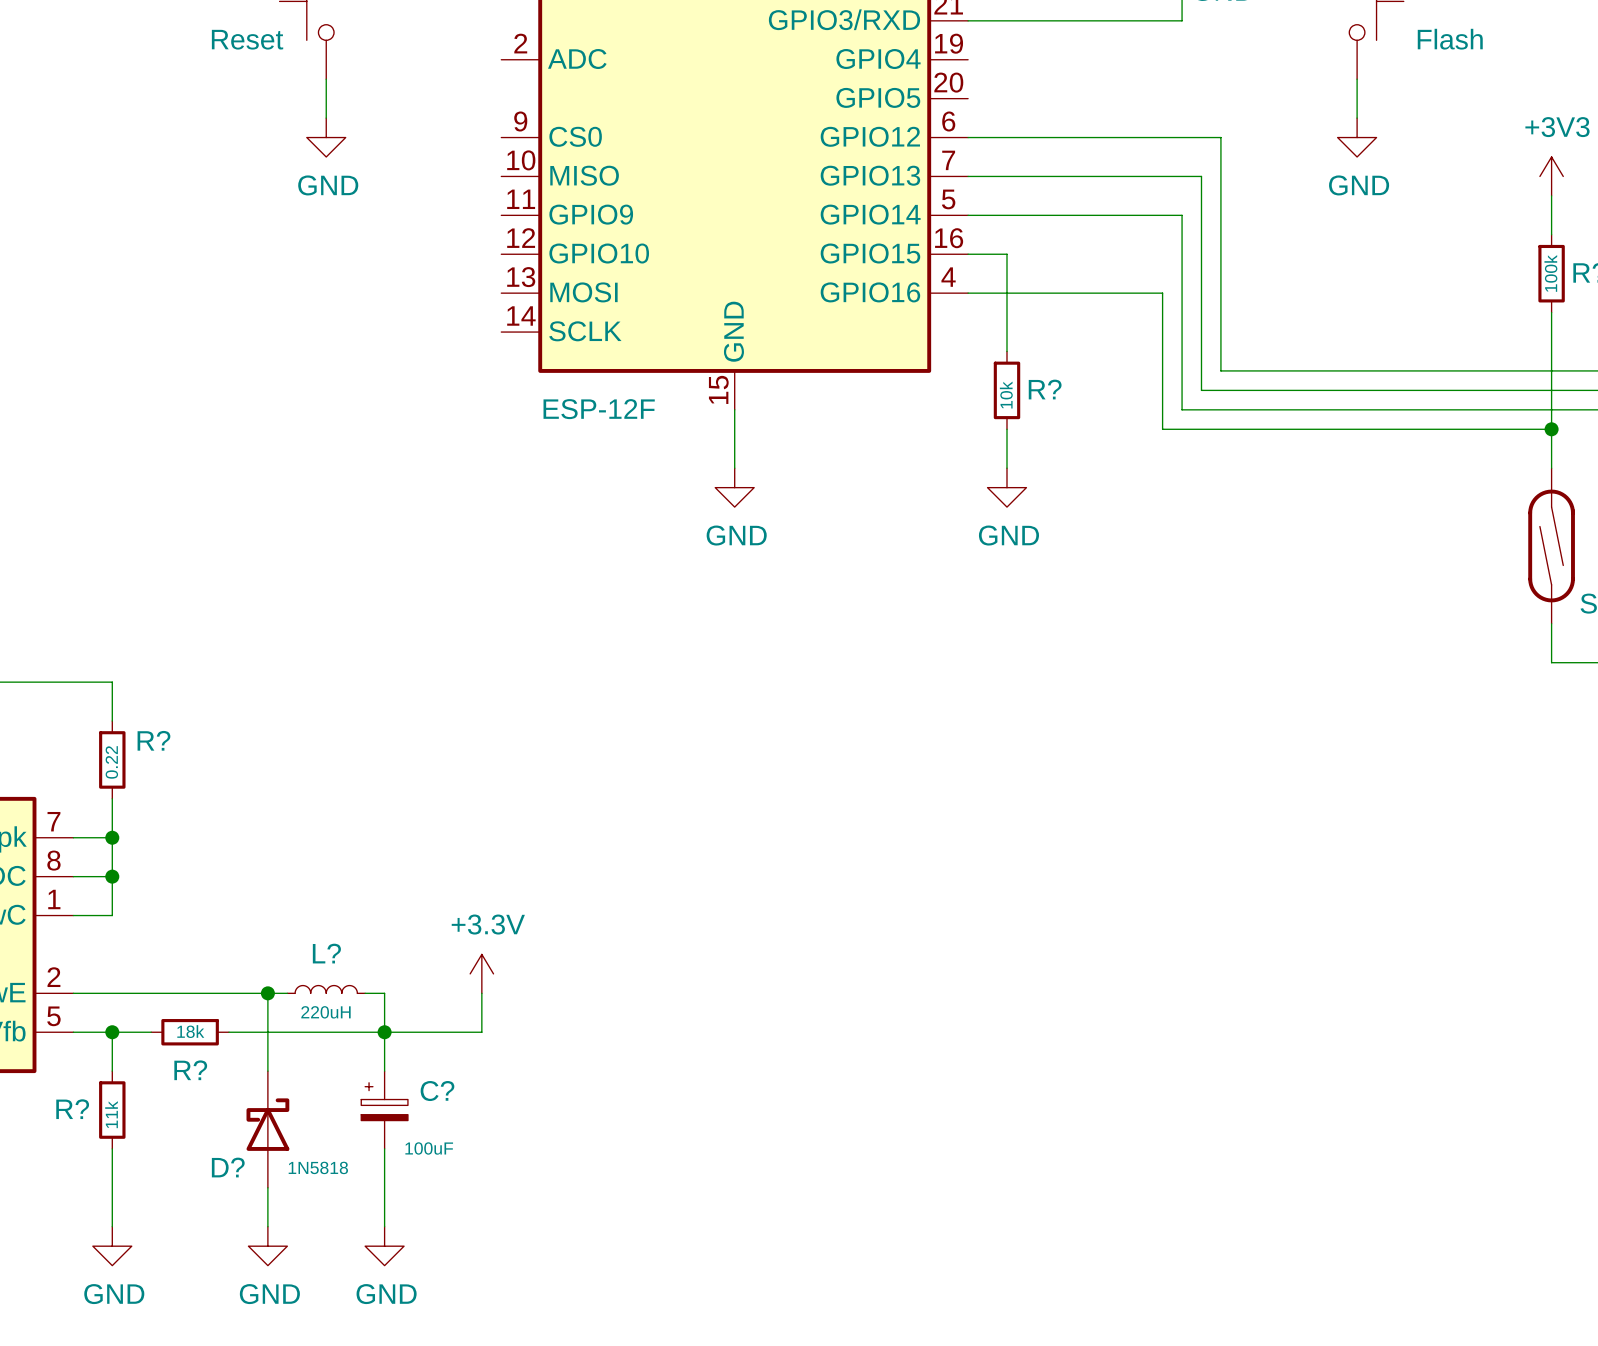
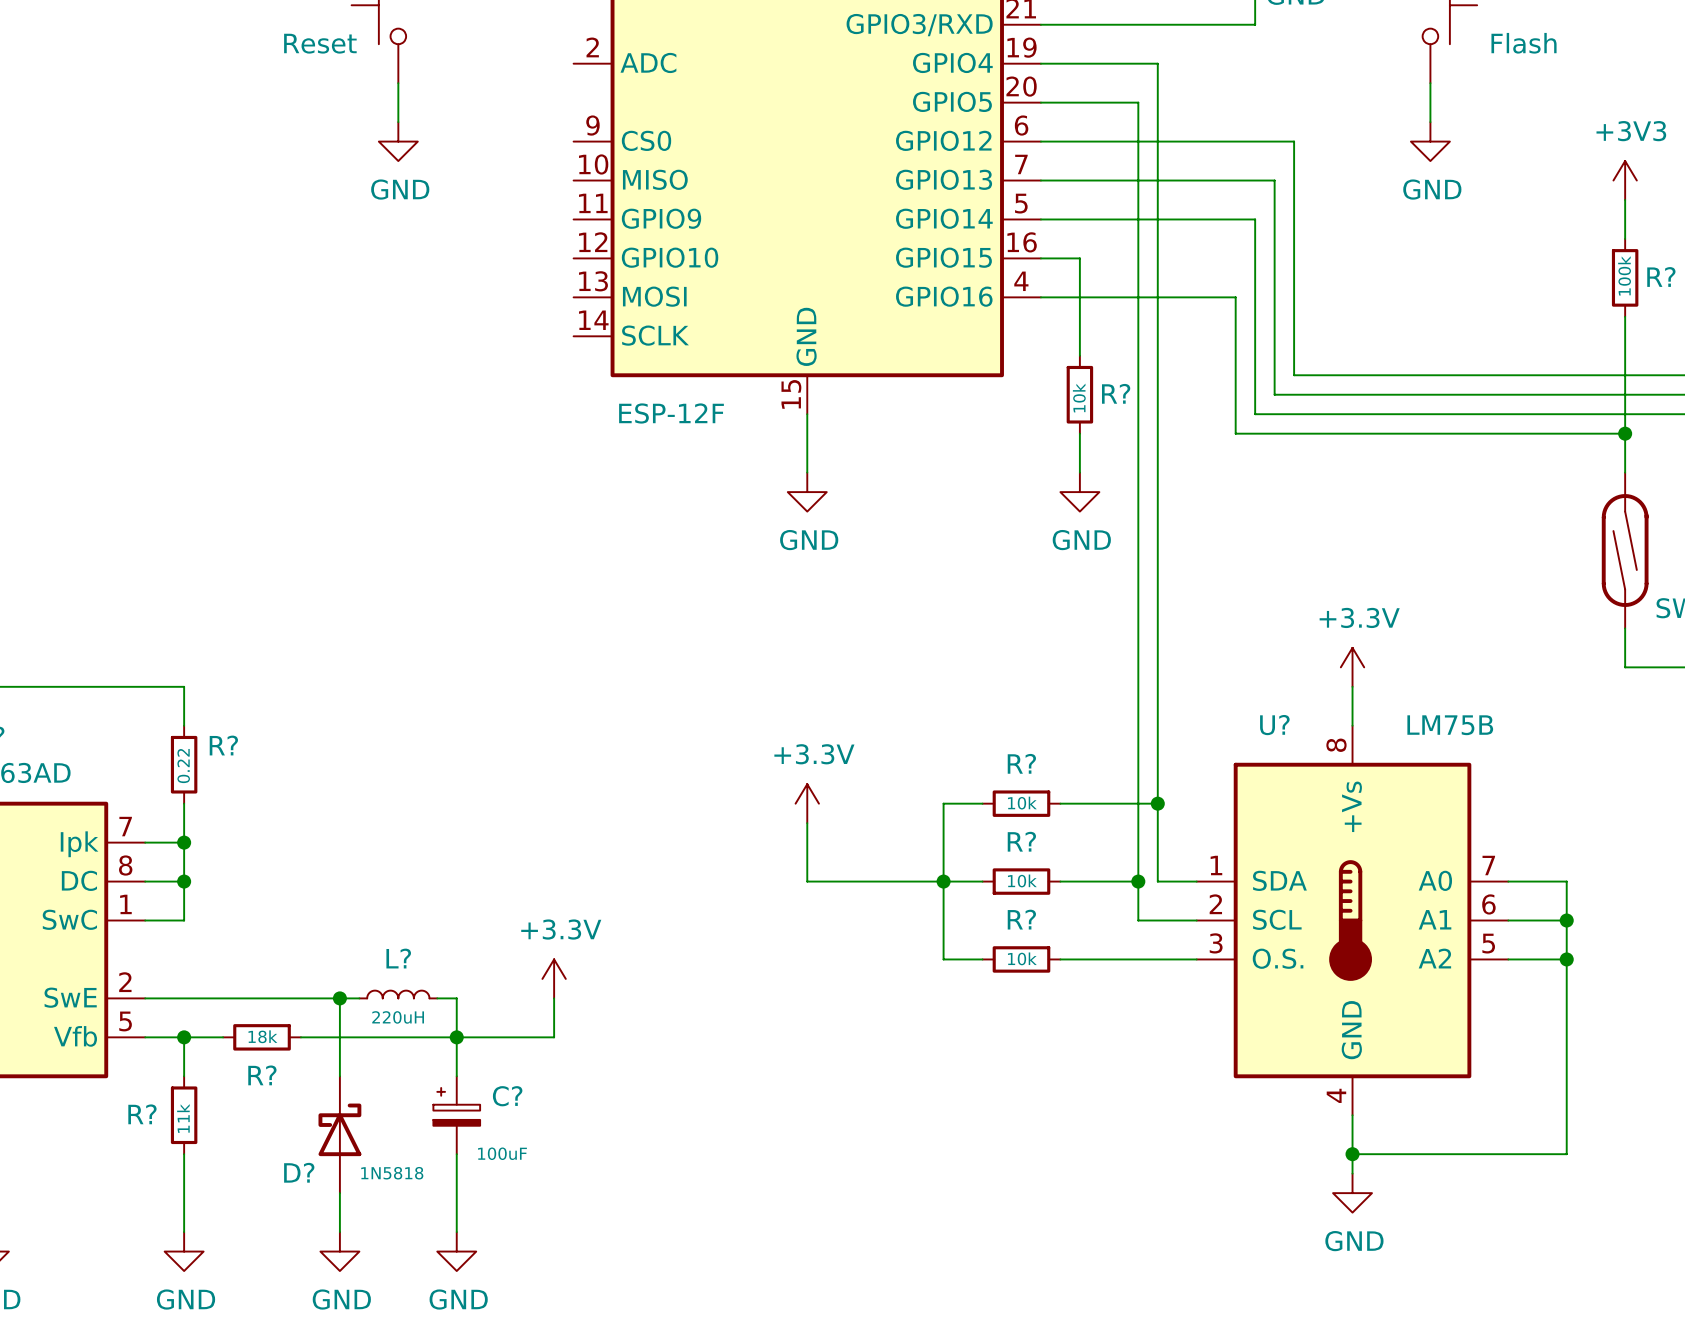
wire: none -> (1040, 63) (1157, 63) (1157, 881) (1196, 881)
wire: none -> (1040, 102) (1138, 102) (1138, 920) (1196, 920)
power symbol: none -> +3.3V (1352, 667)
wire: none -> (1352, 686) (1352, 725)
power symbol: none -> +3.3V (807, 803)
wire: none -> (982, 803) (943, 803) (943, 959) (982, 959)
R?: none -> 10k (1021, 803)
wire: none -> (1060, 803) (1157, 803)
junction: none -> (1157, 803)
wire: none -> (807, 823) (807, 881) (982, 881)
junction: none -> (943, 881)
R?: none -> 10k (1021, 881)
wire: none -> (1060, 881) (1138, 881)
junction: none -> (1138, 881)
wire: none -> (1508, 881) (1566, 881) (1566, 1154) (1352, 1154)
U?: none -> LM75B (1352, 920)
wire: none -> (1508, 920) (1566, 920)
junction: none -> (1566, 920)
R?: none -> 10k (1021, 959)
wire: none -> (1060, 959) (1196, 959)
wire: none -> (1508, 959) (1566, 959)
junction: none -> (1566, 959)
wire: none -> (1352, 1115) (1352, 1173)
junction: none -> (1352, 1154)
power symbol: none -> GND (1352, 1193)

